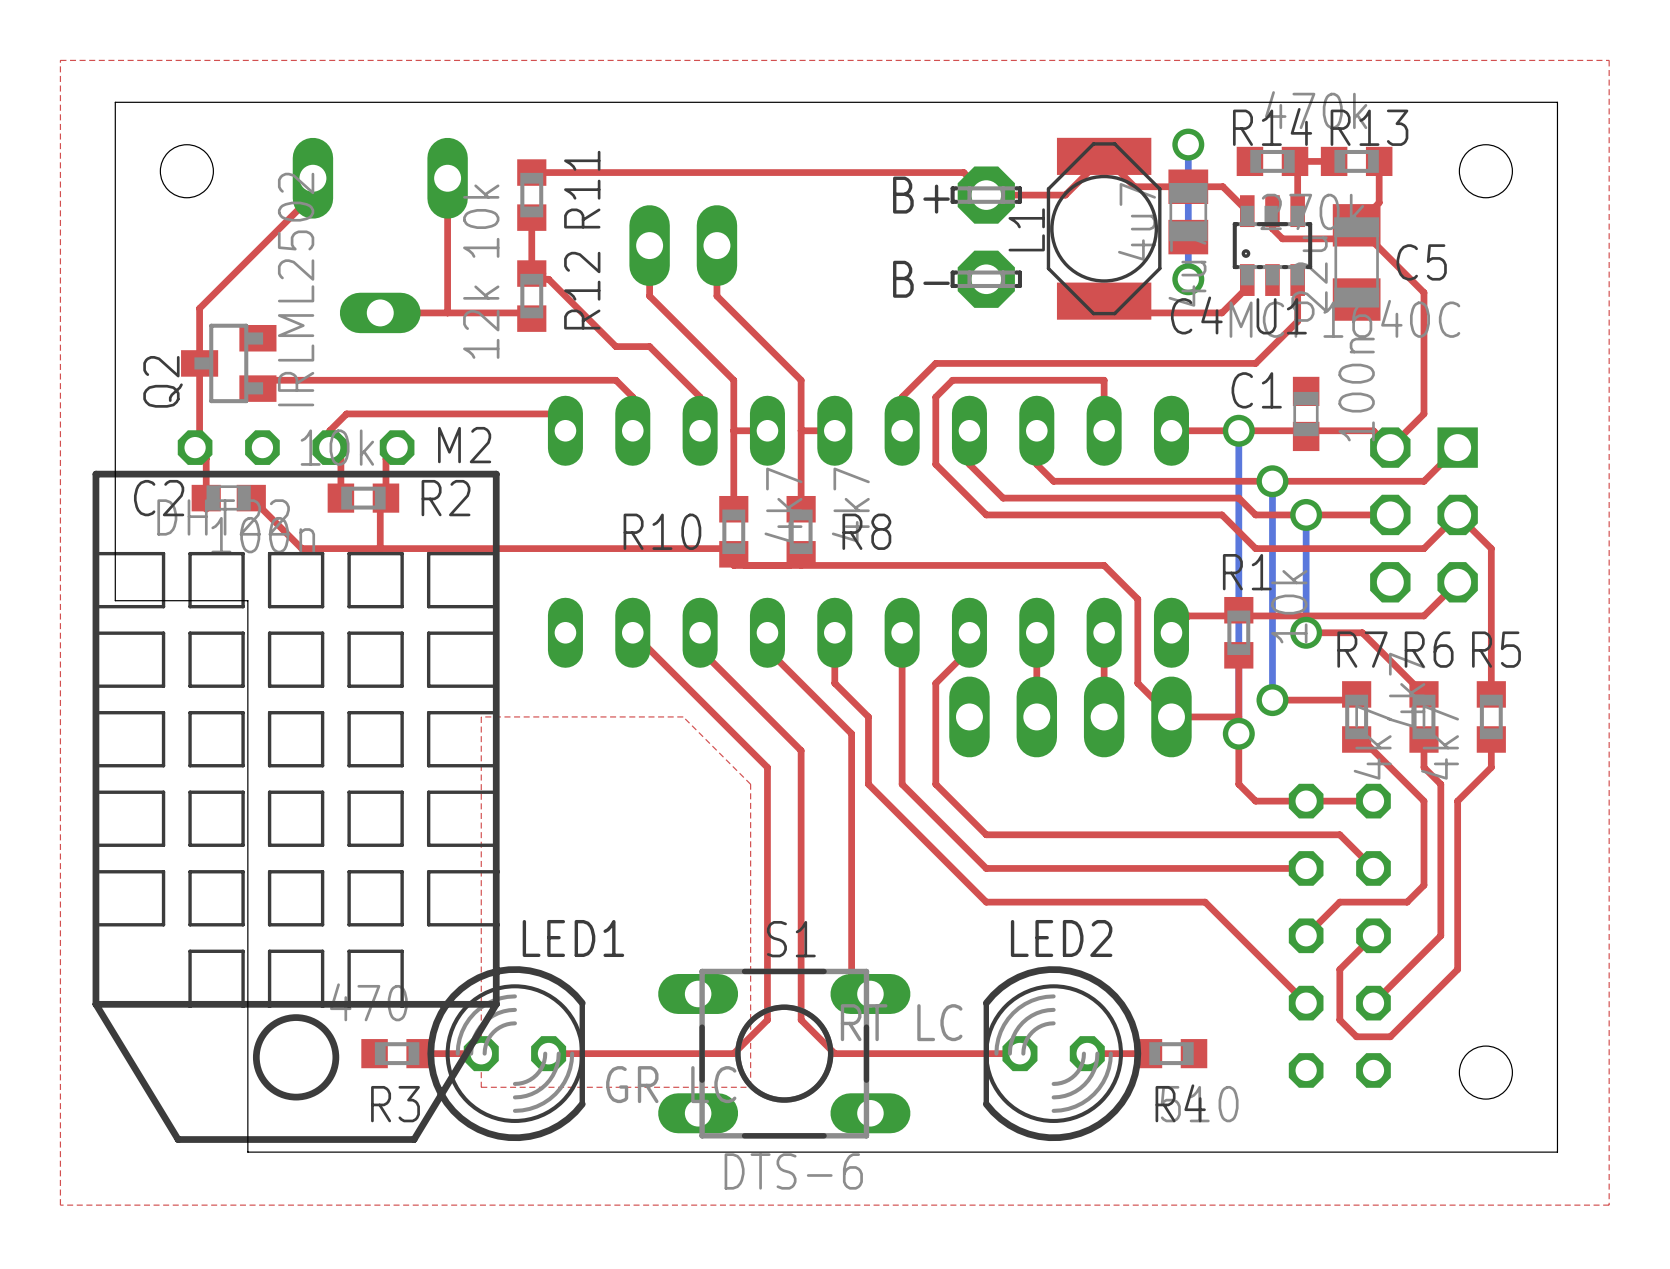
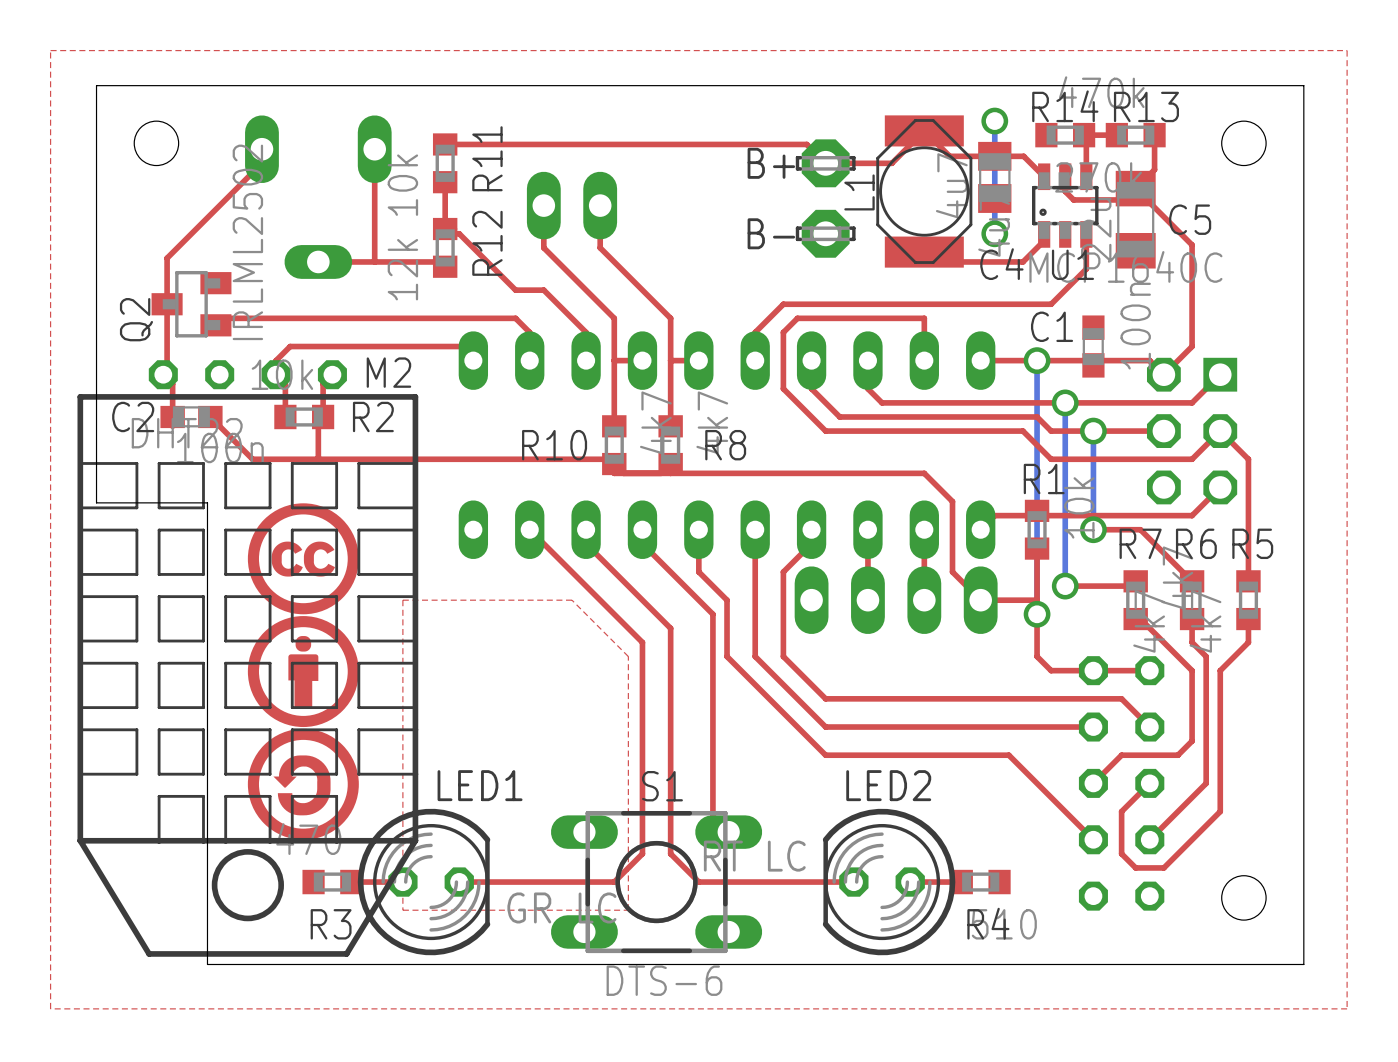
drawing: none -> [247, 503, 359, 840]

